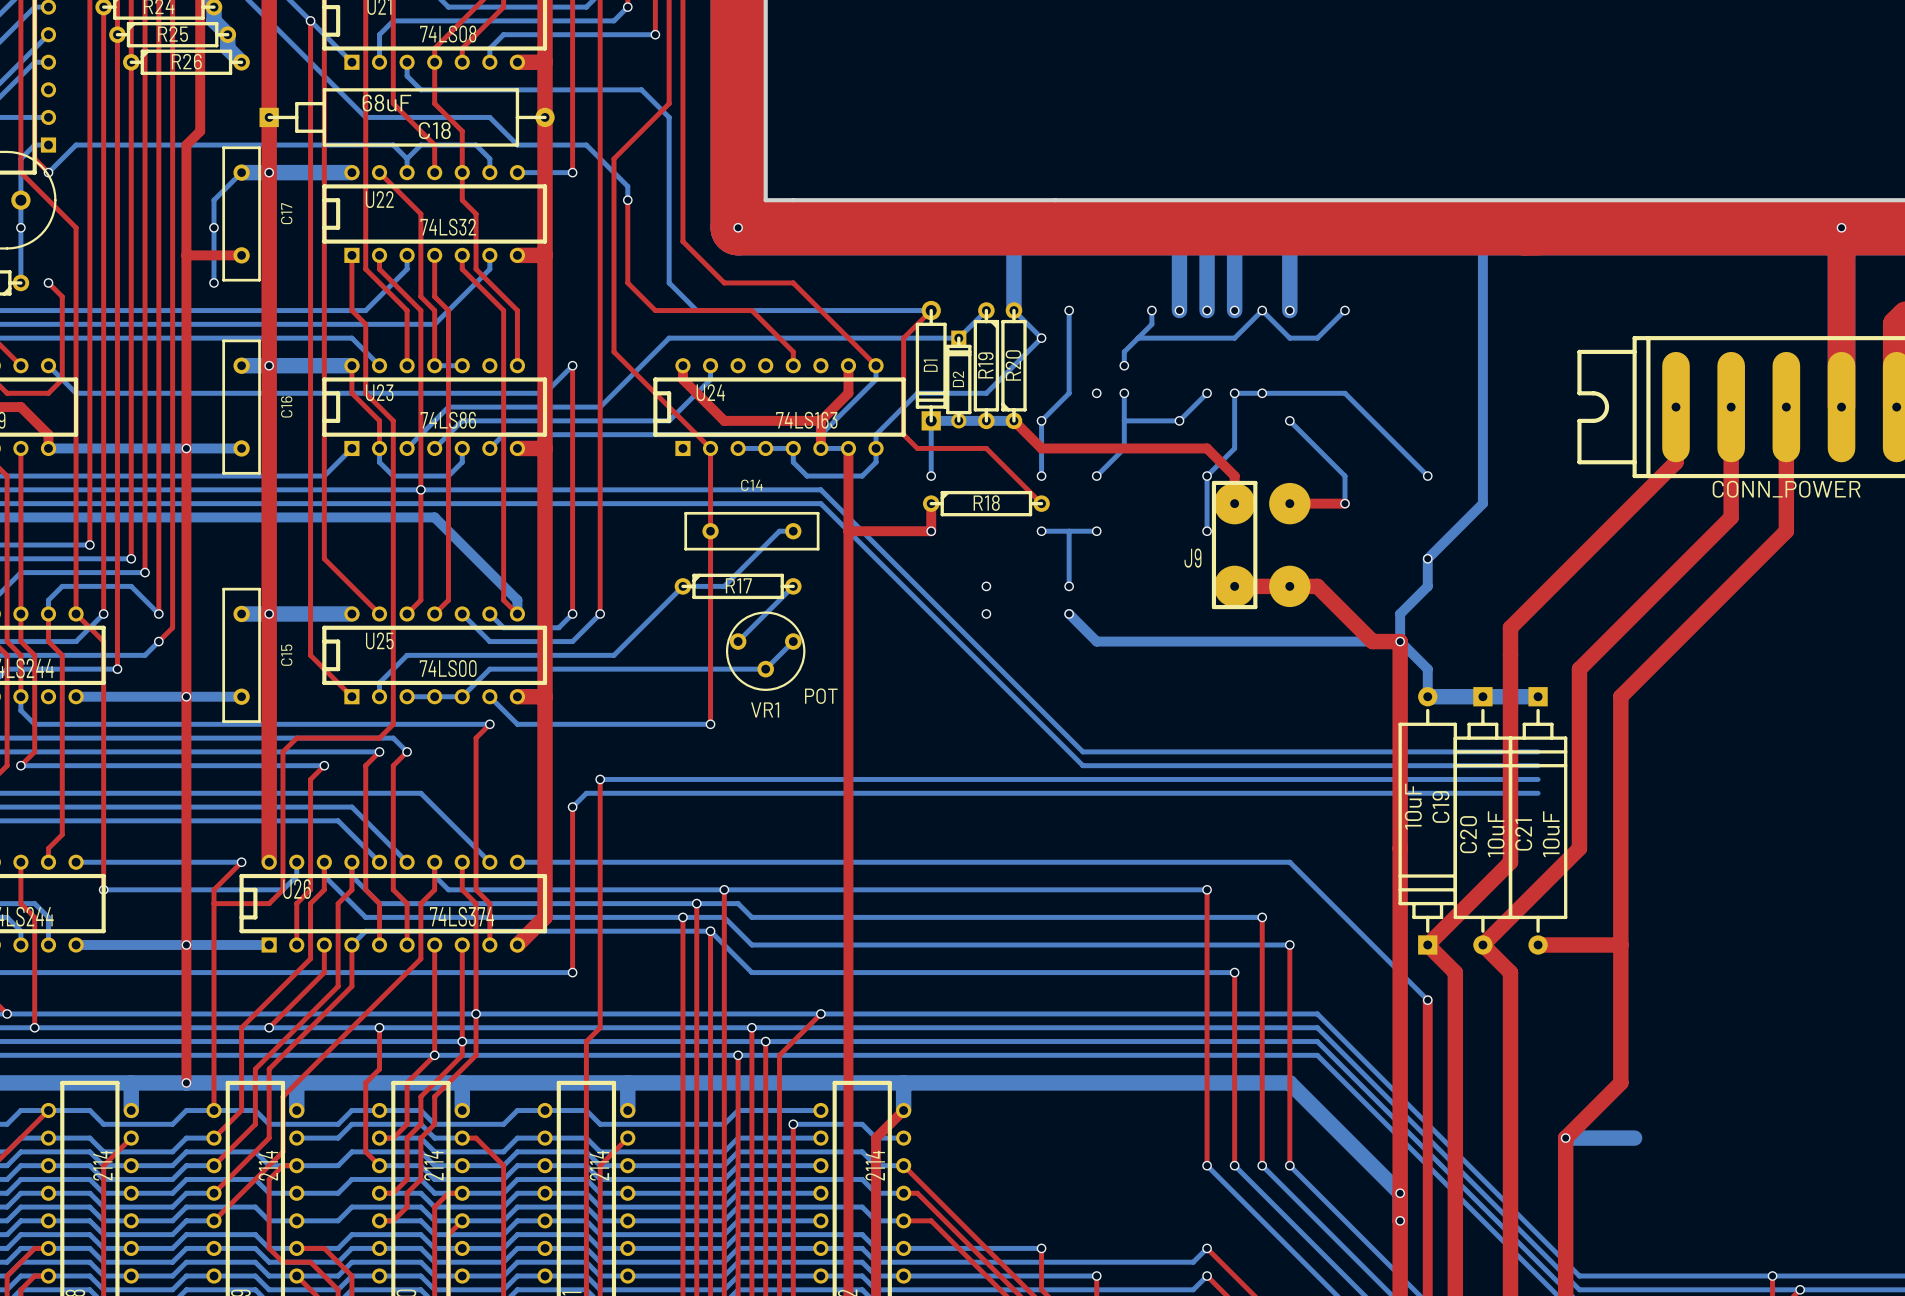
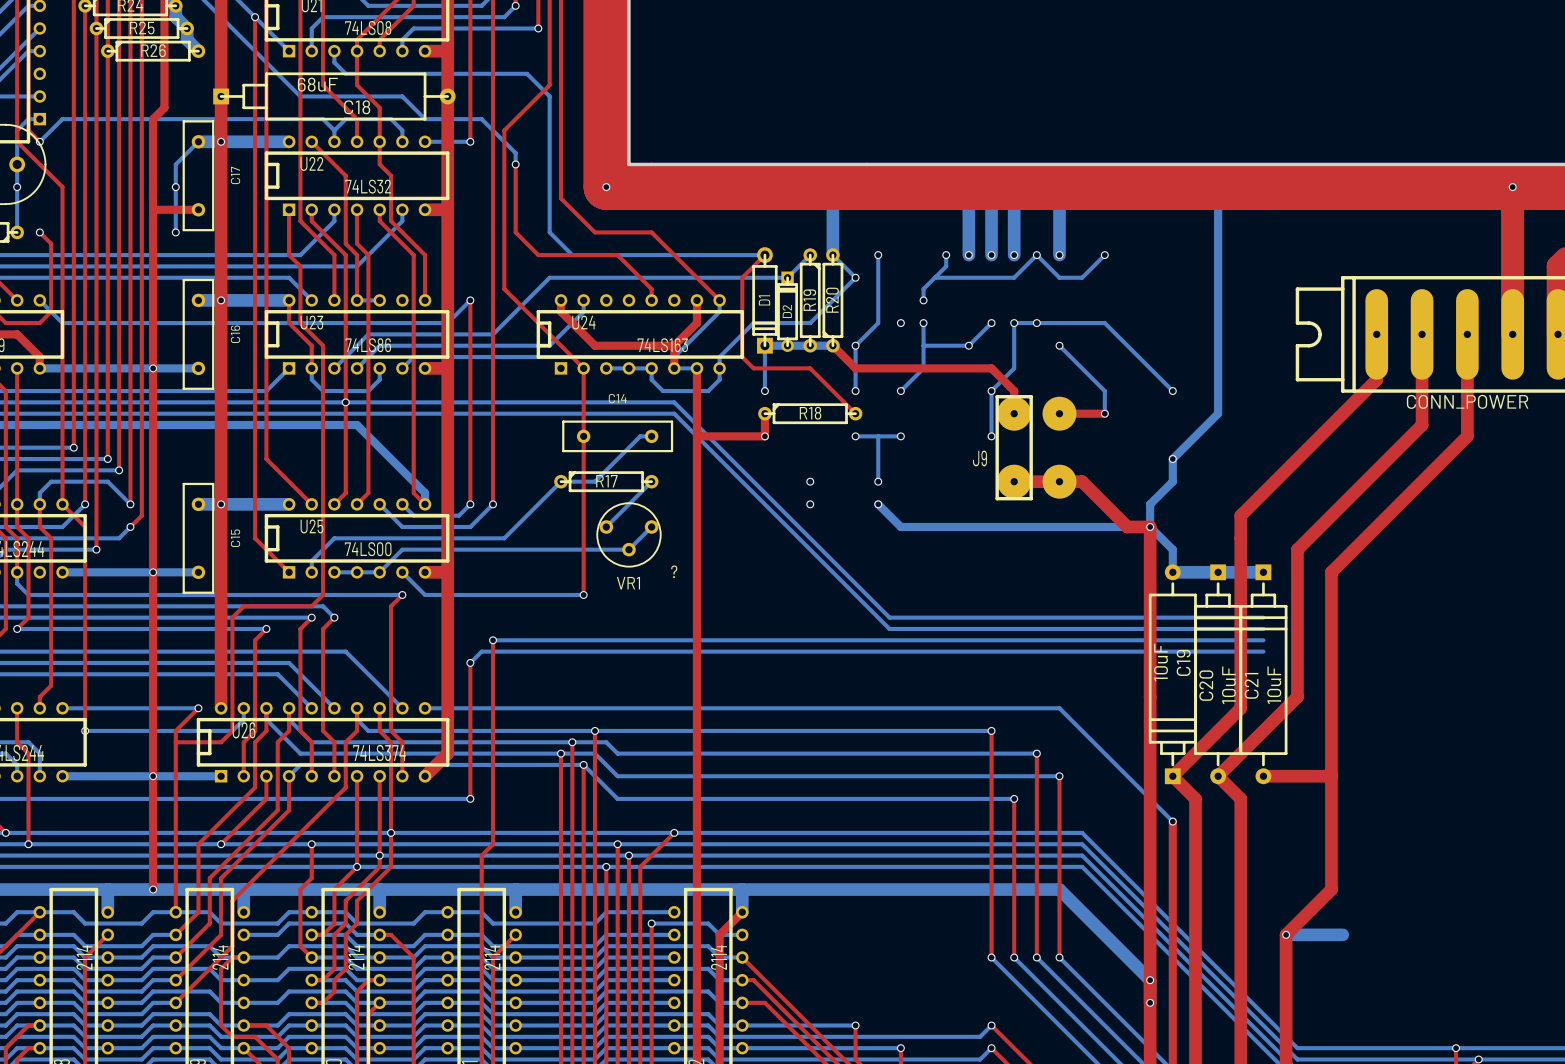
VR1 value: POT (821, 696) -> ? (674, 571)

